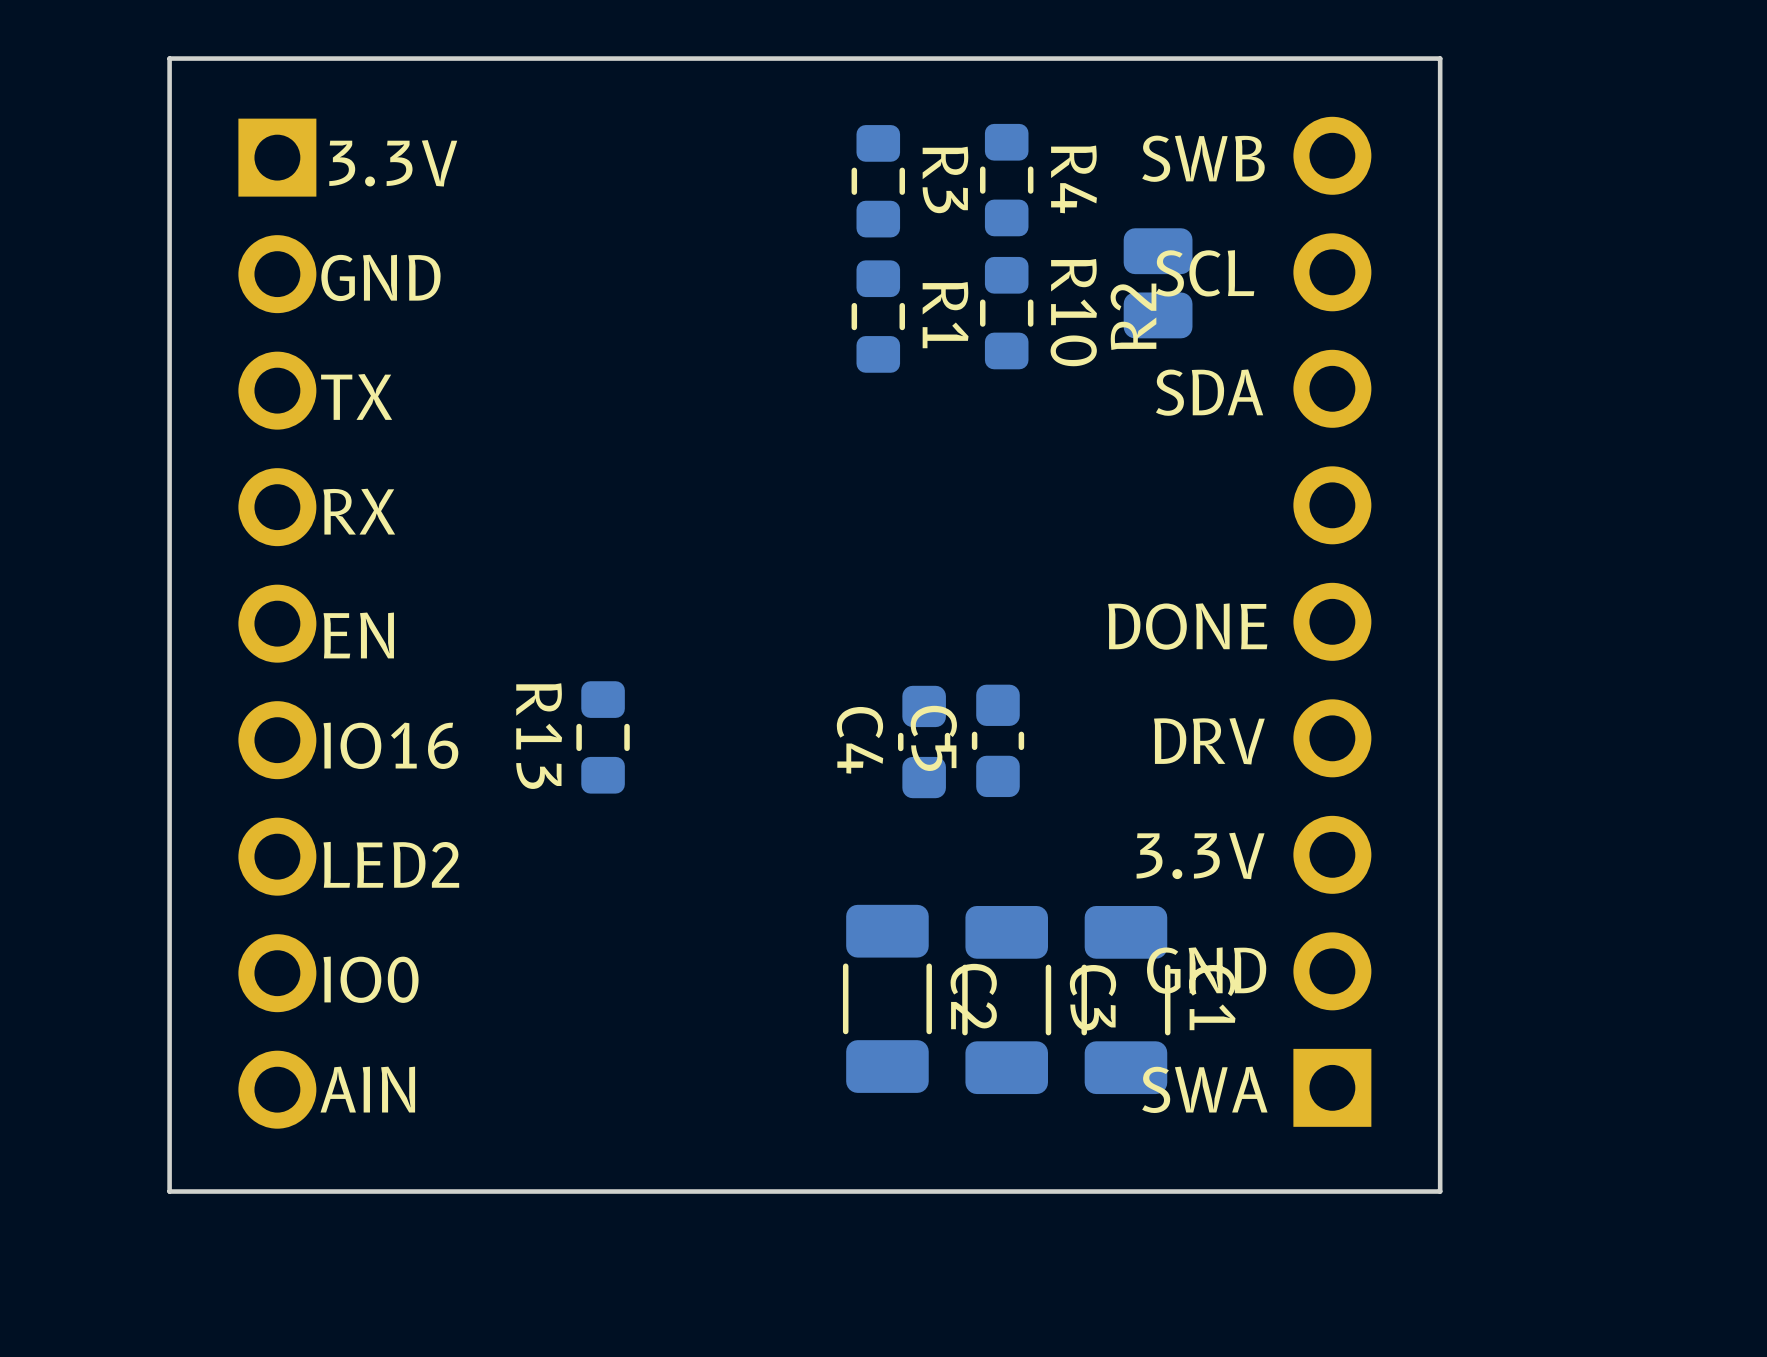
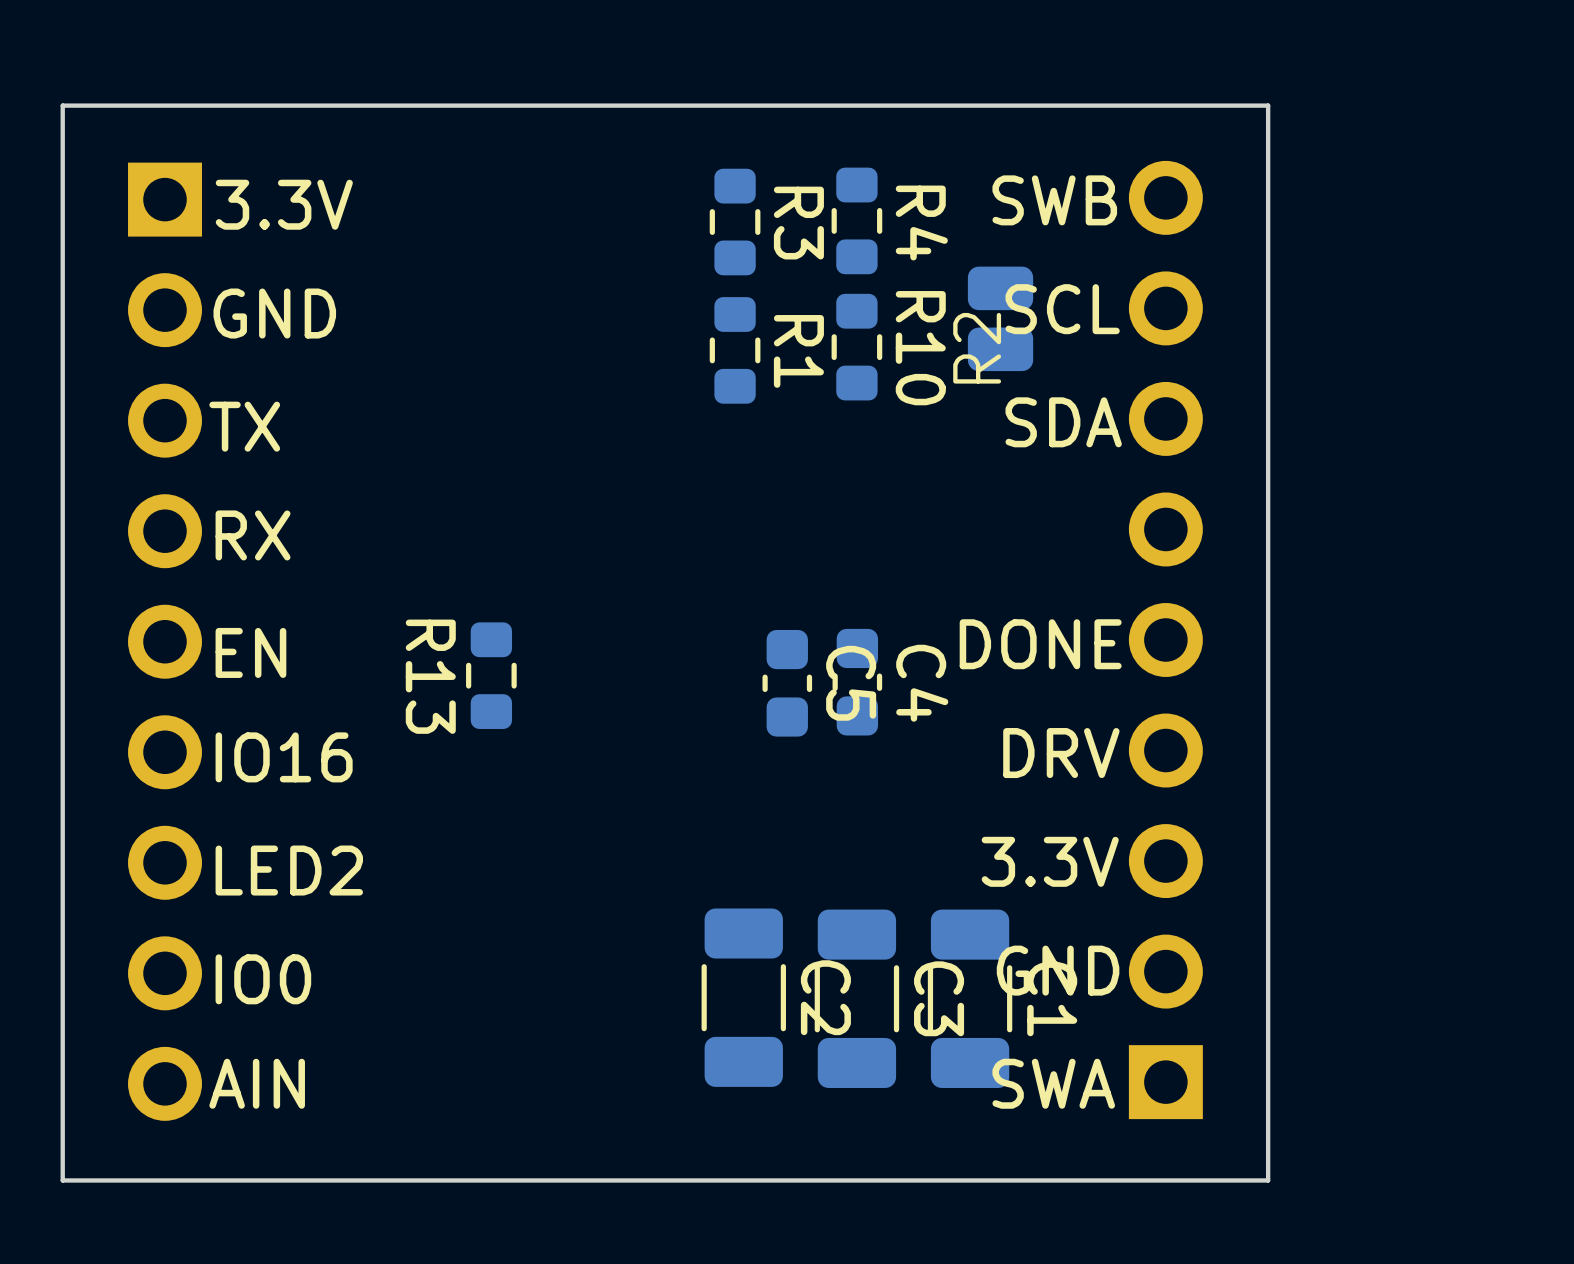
R13 position: (603, 737) -> (491, 675)
C5 name position: C5 (933, 738) -> C5 (851, 683)
C4 name position: C4 (860, 740) -> C4 (922, 683)
C5 position: (997, 740) -> (787, 683)
C4 position: (924, 742) -> (857, 682)

